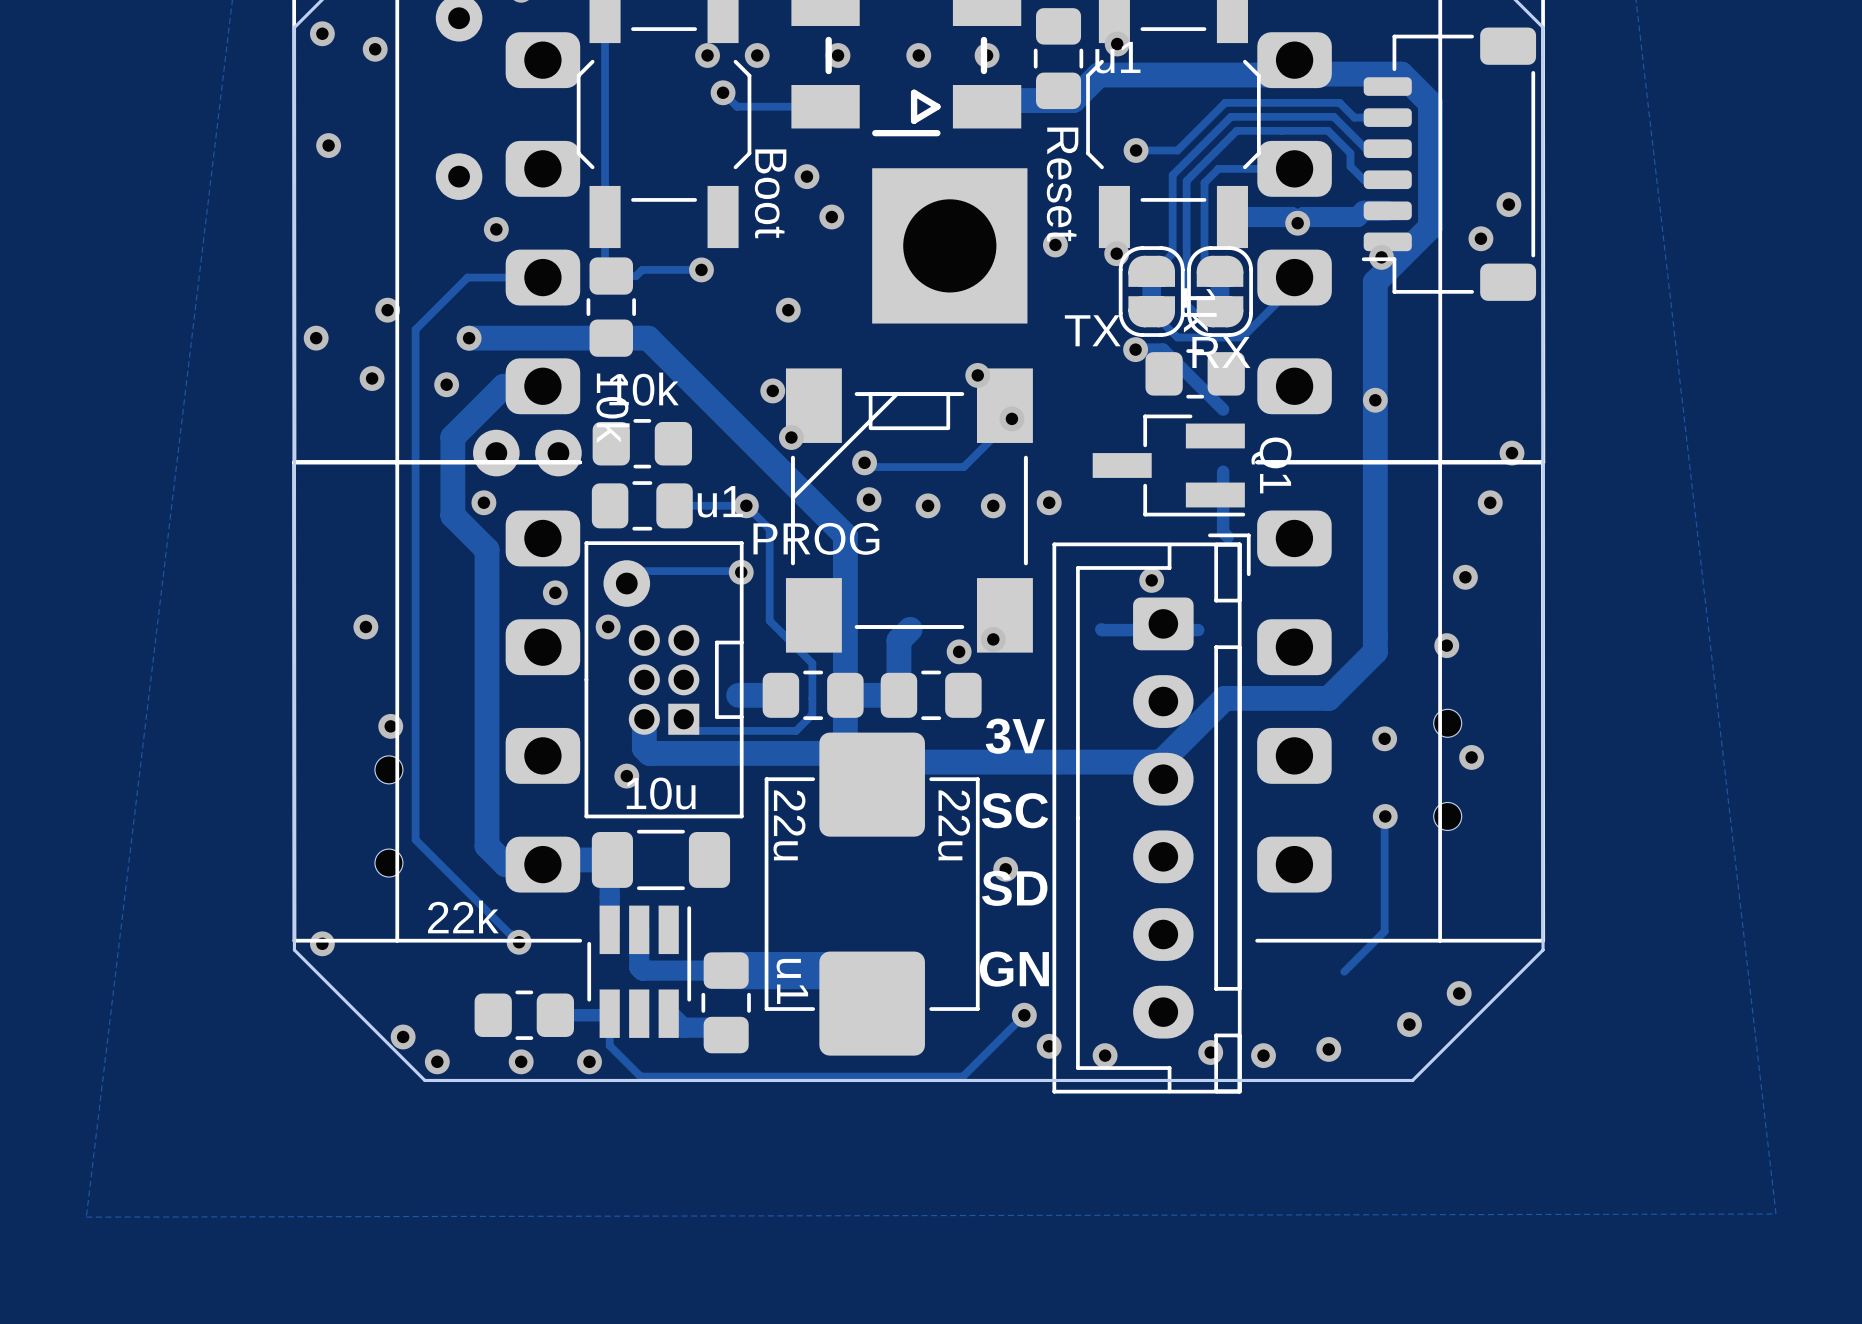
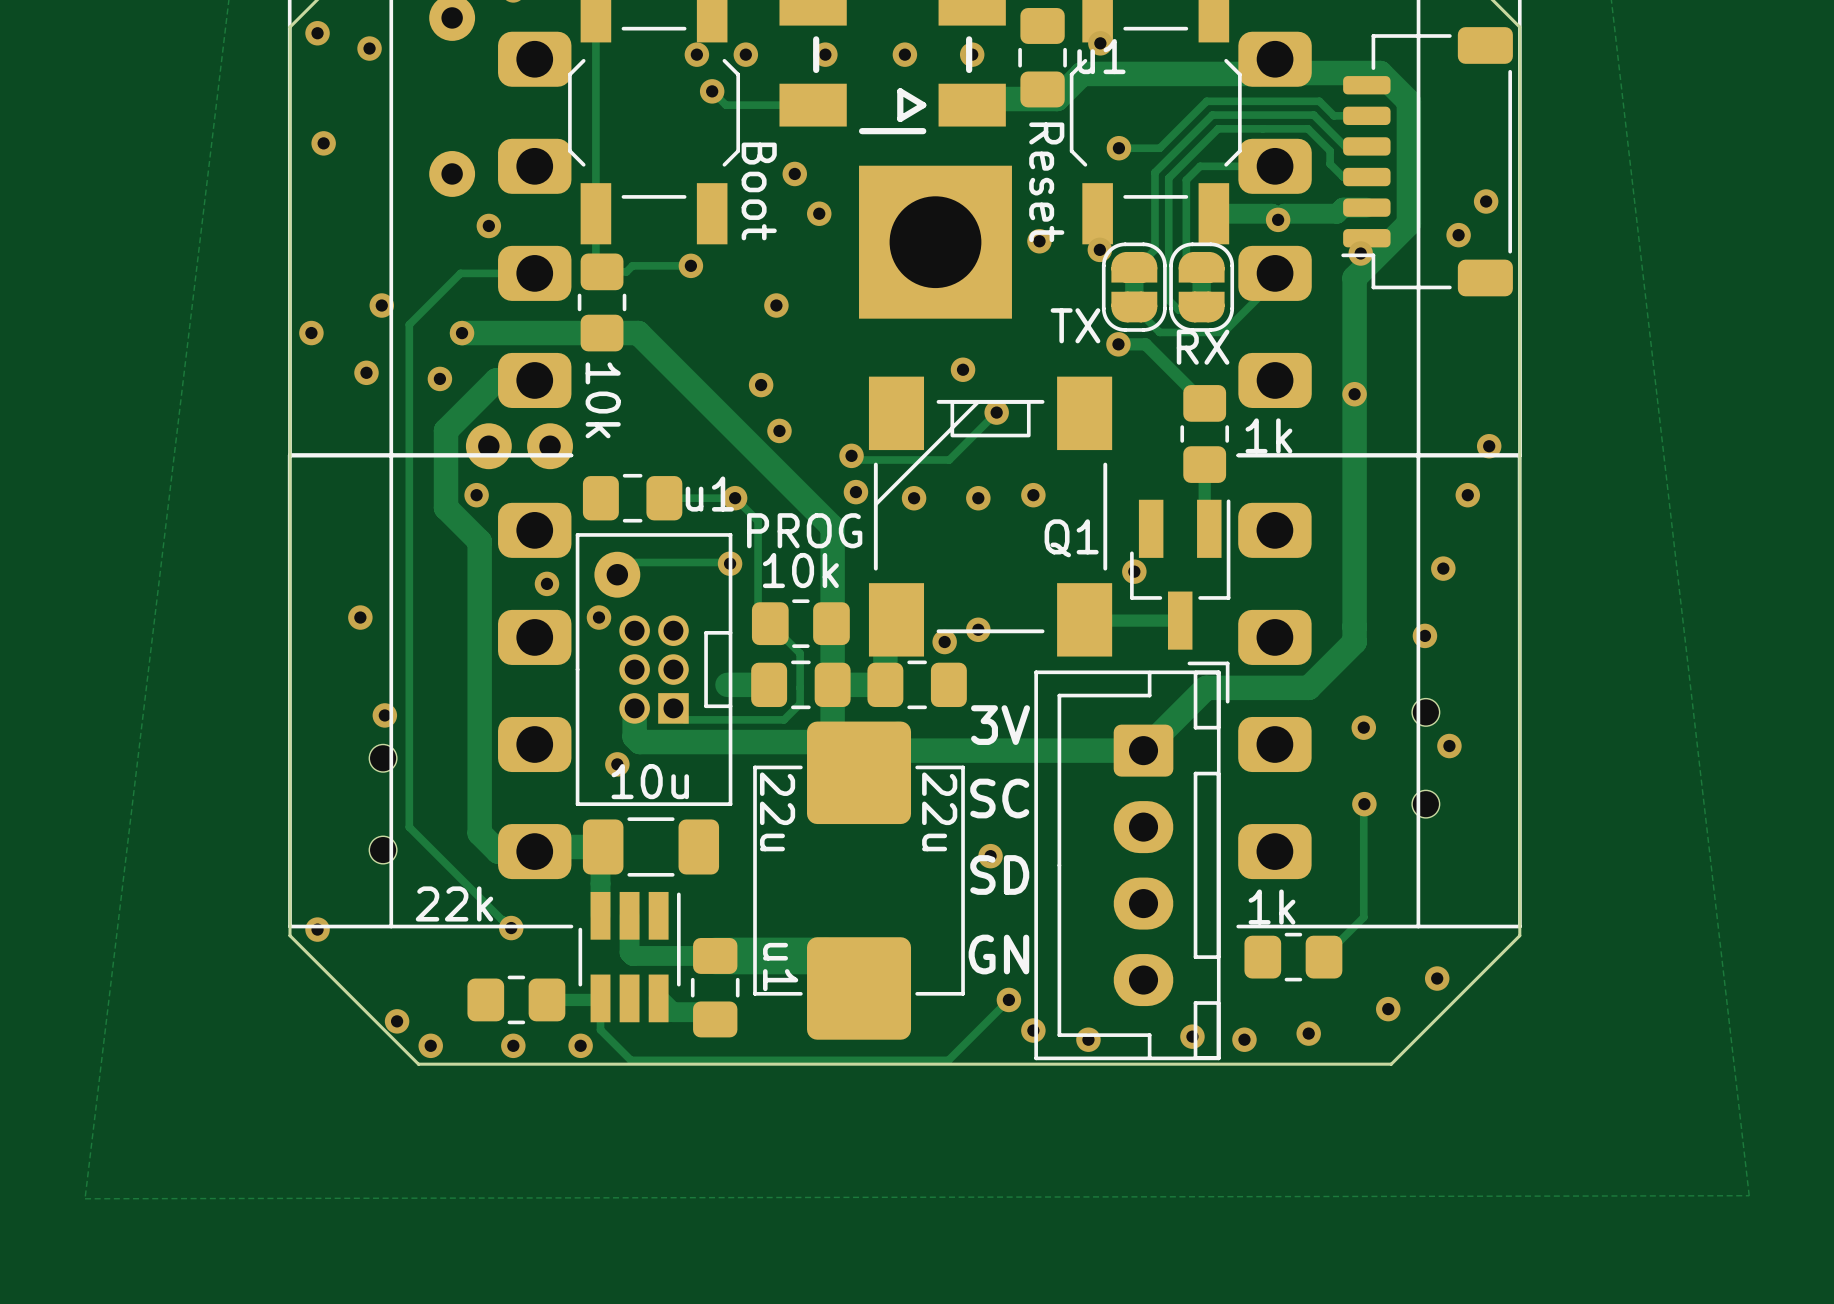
part rotation: 0° (1195, 373) -> 90° clockwise (1204, 433)
part position: (1195, 373) -> (1204, 433)
part position: (642, 443) -> (800, 623)
Q1 rotation: 0° (1168, 465) -> 90° counterclockwise (1180, 574)
Q1 position: (1168, 465) -> (1180, 574)
Q1 name position: Q1 (1271, 465) -> Q1 (1071, 538)
part position: (909, 510) -> (990, 516)
part: (1151, 813) -> none
part: none -> (1131, 860)
part: none -> 1k (1293, 957)

